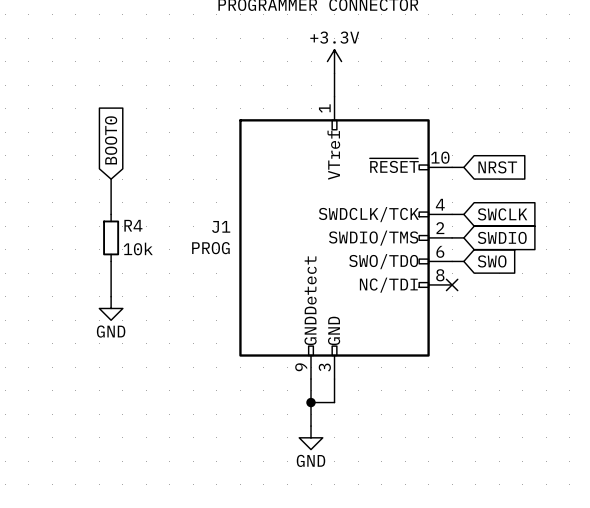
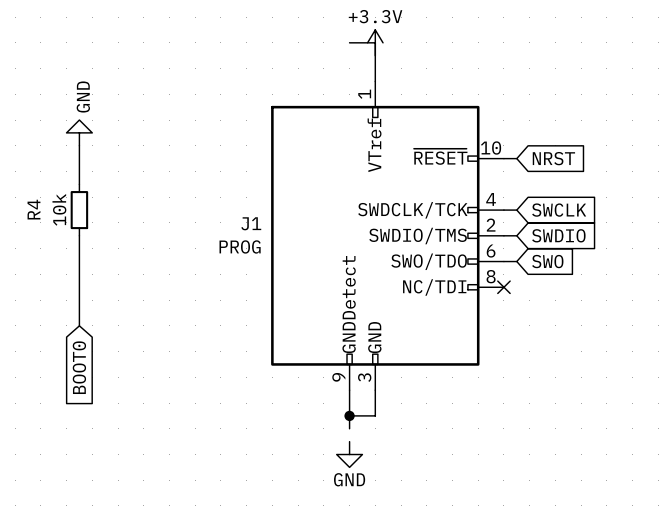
wire: none -> (349, 42) (375, 42) (375, 55)
global label rotation: 0° (111, 140) -> 180° (79, 367)
global label position: BOOT0 (111, 140) -> BOOT0 (79, 367)
wire: (111, 179) (111, 214) -> (79, 145) (79, 184)
R4 name rotation: 0° (133, 225) -> 90° counterclockwise (33, 209)
R4 name position: R4 (133, 225) -> R4 (33, 209)
wire: none -> (79, 235) (79, 325)
R4 position: (111, 237) -> (79, 210)
R4 value rotation: 0° (138, 248) -> 90° counterclockwise (59, 209)
R4 value position: 10k (138, 248) -> 10k (59, 209)
wire: (111, 261) (111, 296) -> none
power symbol rotation: 0° (111, 308) -> 180° (79, 132)
power symbol position: GND (111, 308) -> GND (79, 132)
wire: (311, 414) (311, 426) -> none

